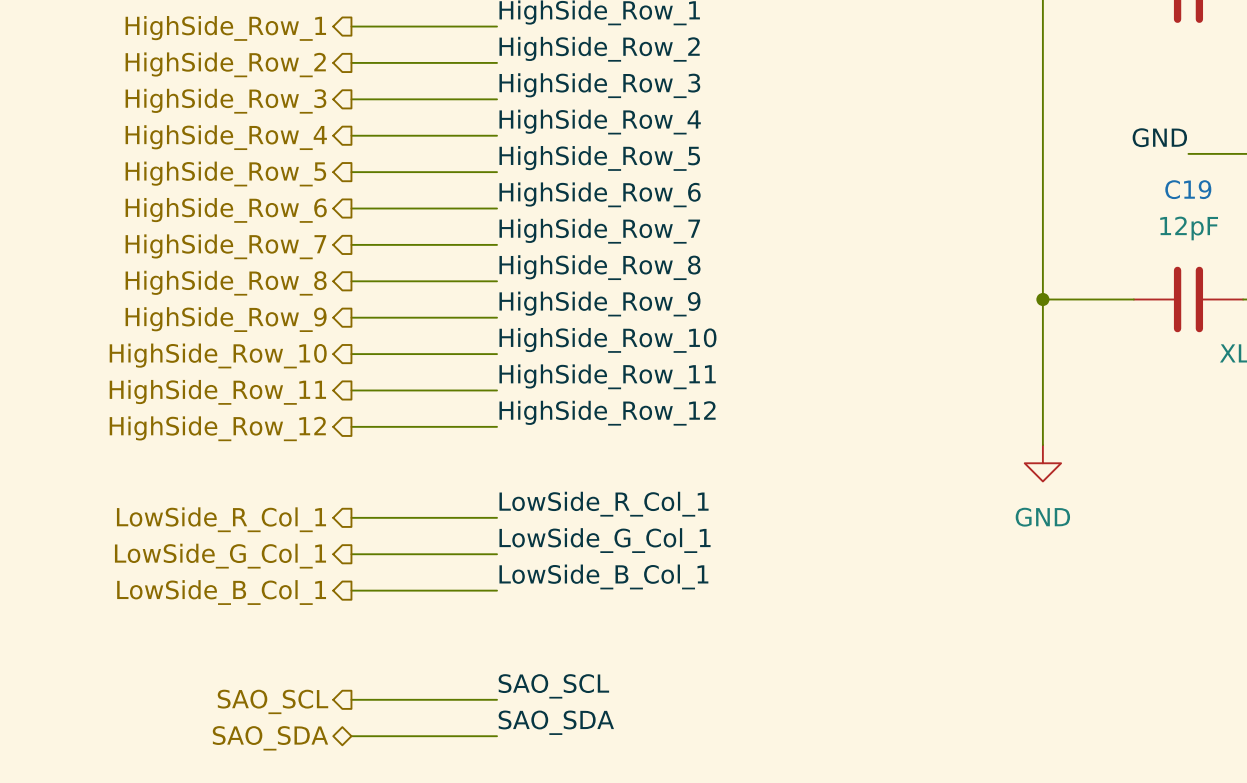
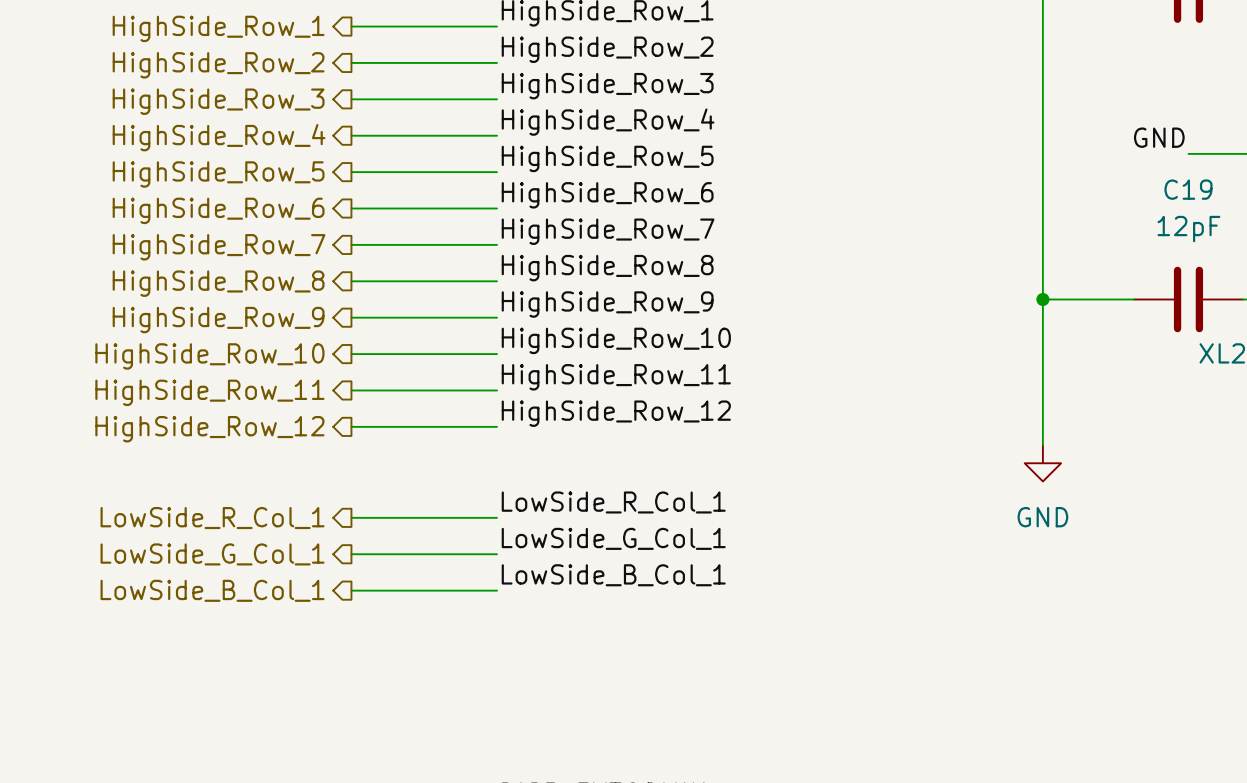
label: SAO_SCL (553, 686) -> none
wire: (351, 699) (497, 699) -> none
hierarchical label: SAO_SCL (272, 701) -> none
label: SAO_SDA (556, 722) -> none
wire: (351, 736) (497, 736) -> none
hierarchical label: SAO_SDA (270, 738) -> none

